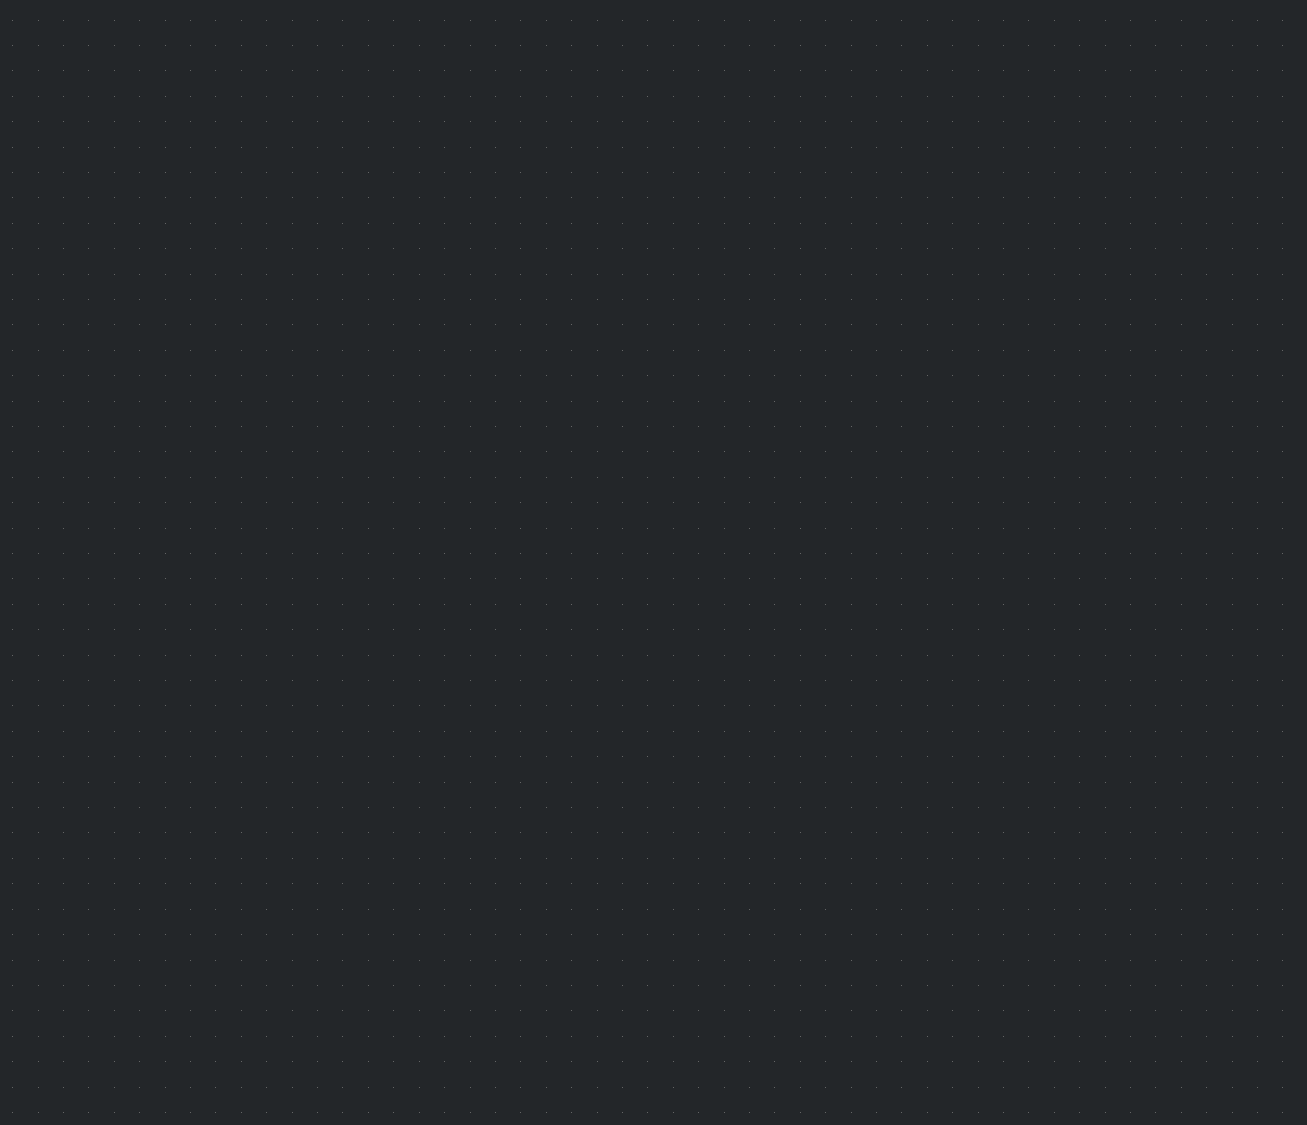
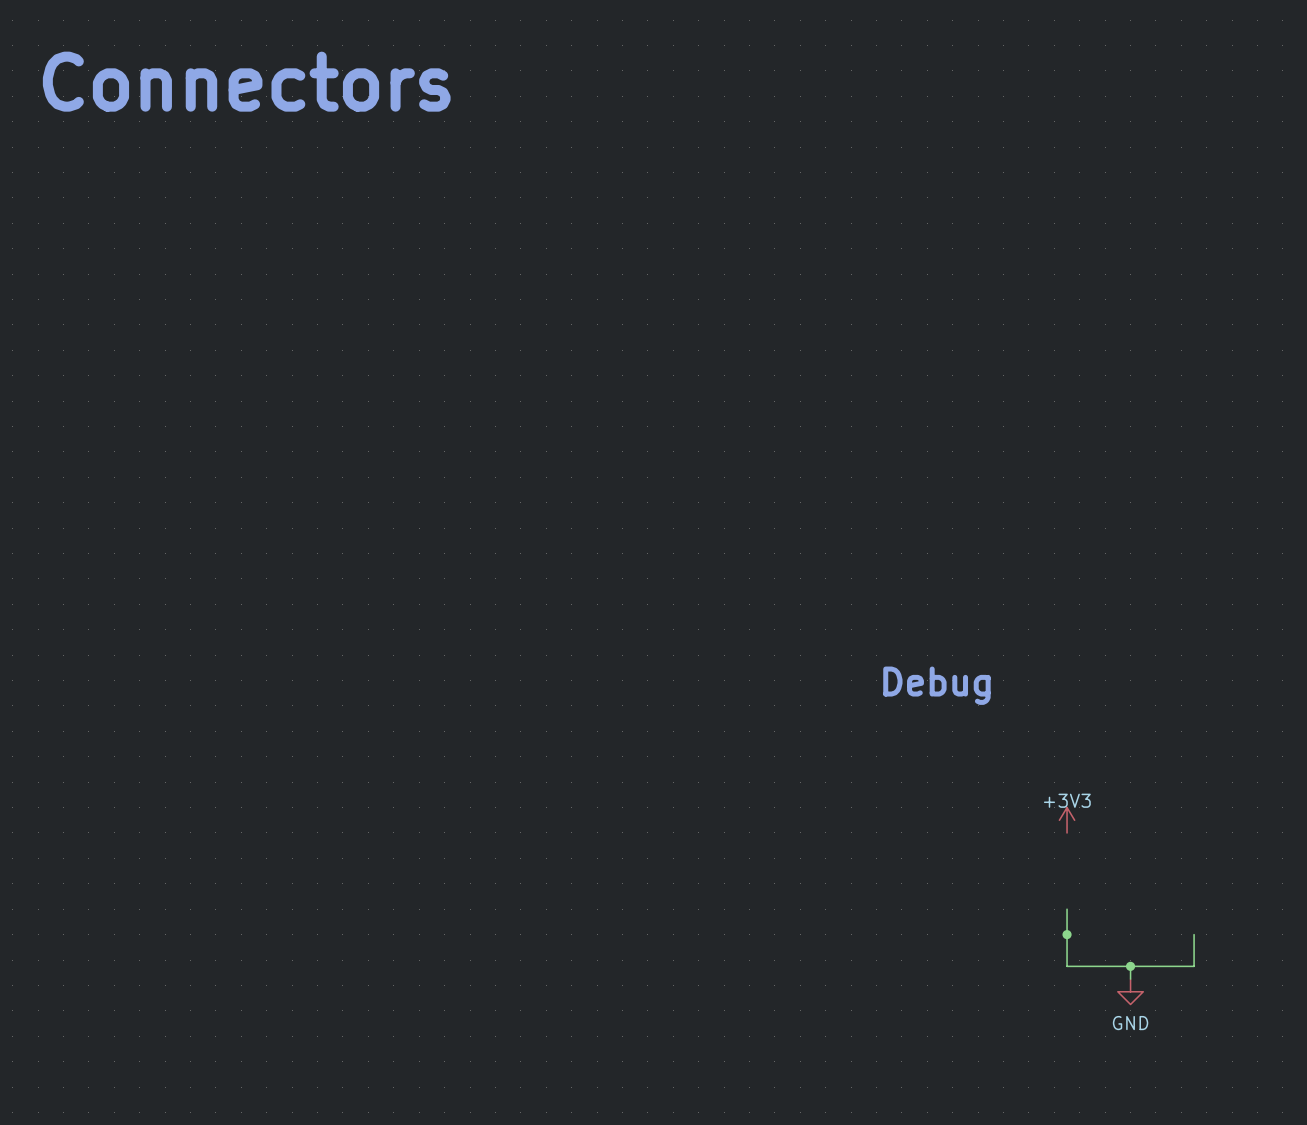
text: none -> Connectors (246, 81)
text: none -> Debug (936, 685)
power symbol: none -> +3V3 (1067, 820)
wire: none -> (1067, 909) (1067, 966) (1194, 966) (1194, 934)
junction: none -> (1067, 934)
wire: none -> (1130, 966) (1130, 979)
junction: none -> (1130, 966)
power symbol: none -> GND (1130, 991)

